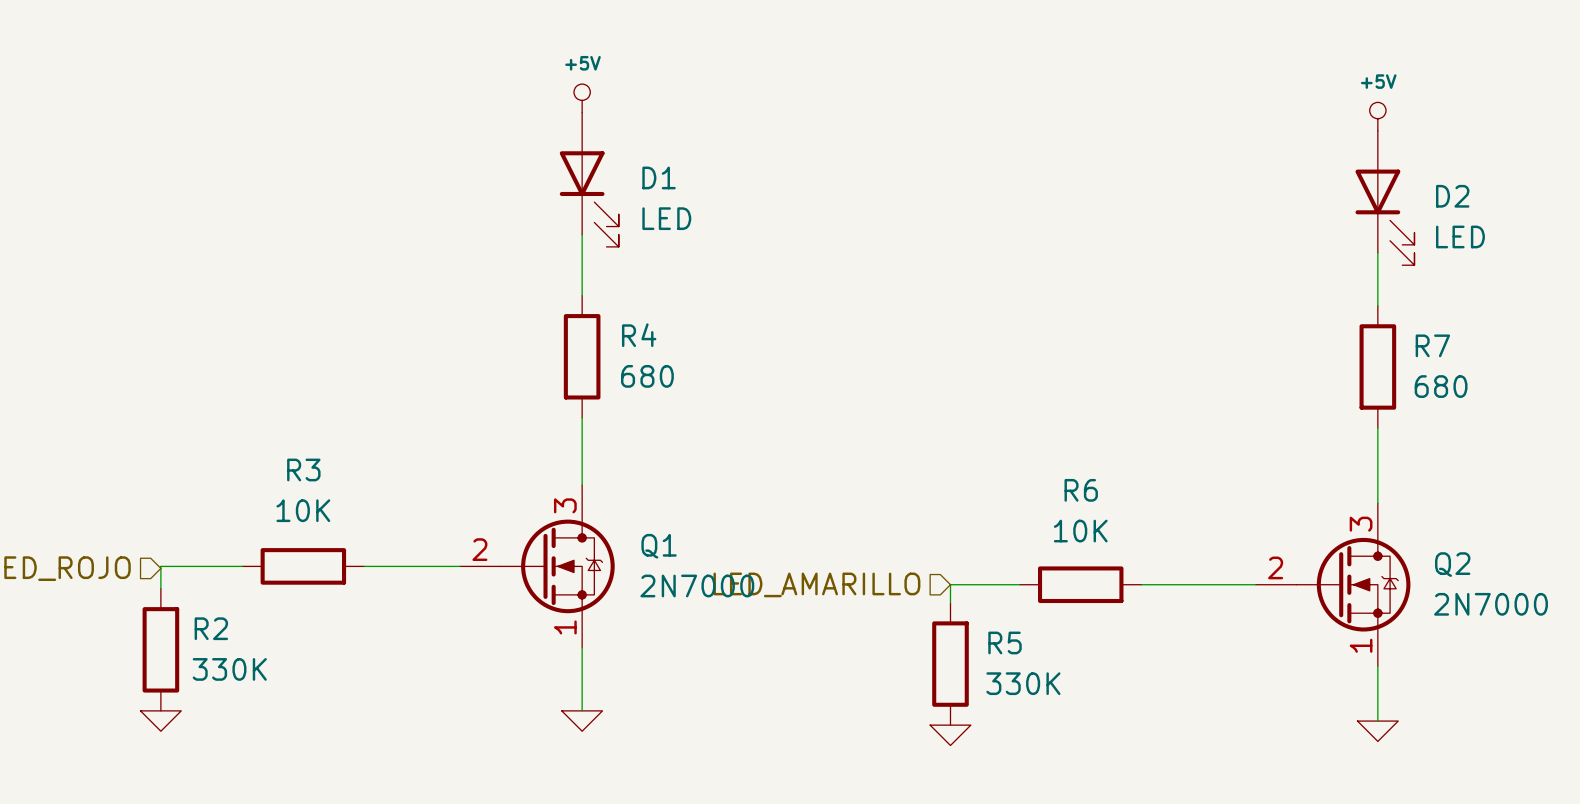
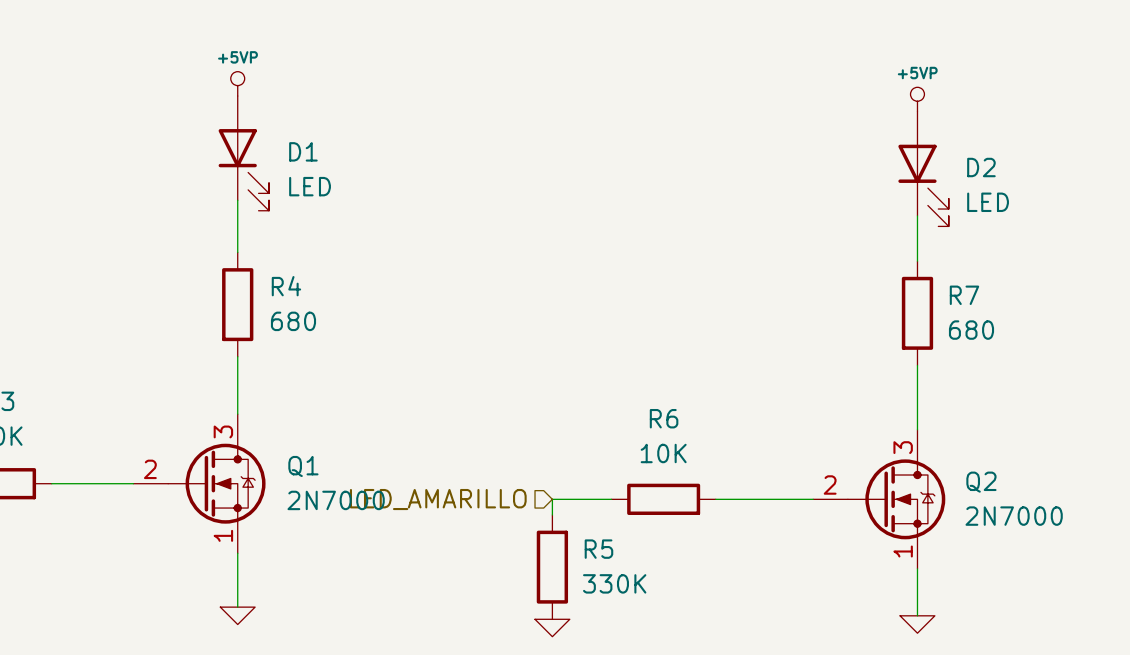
power symbol: +5V (582, 98) -> +5VP (237, 83)
power symbol: +5V (1377, 116) -> +5VP (917, 99)

